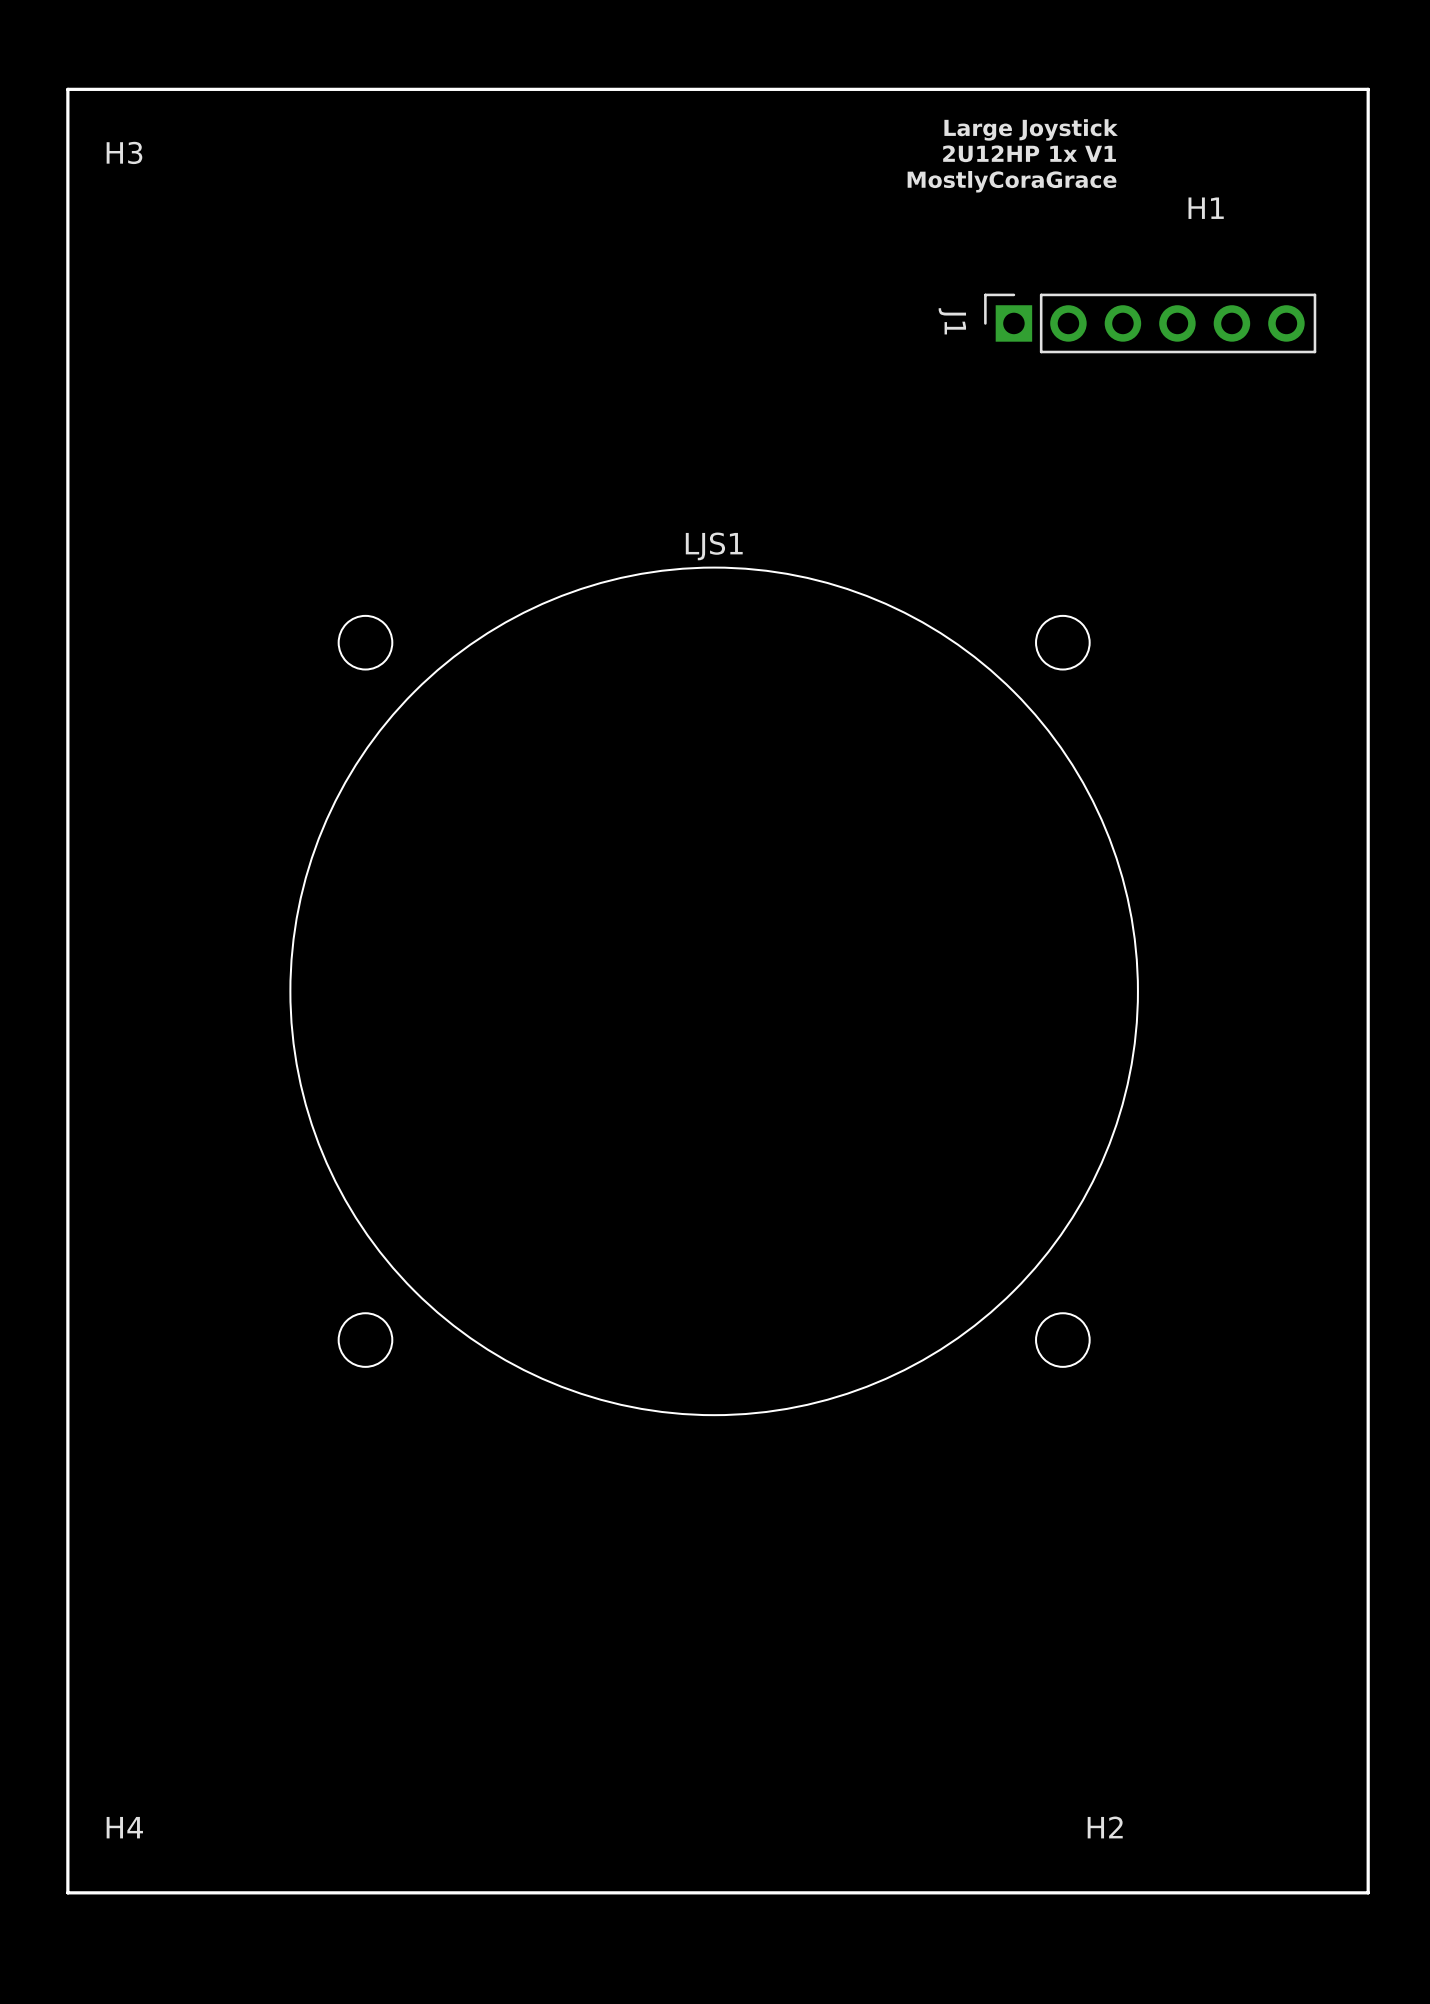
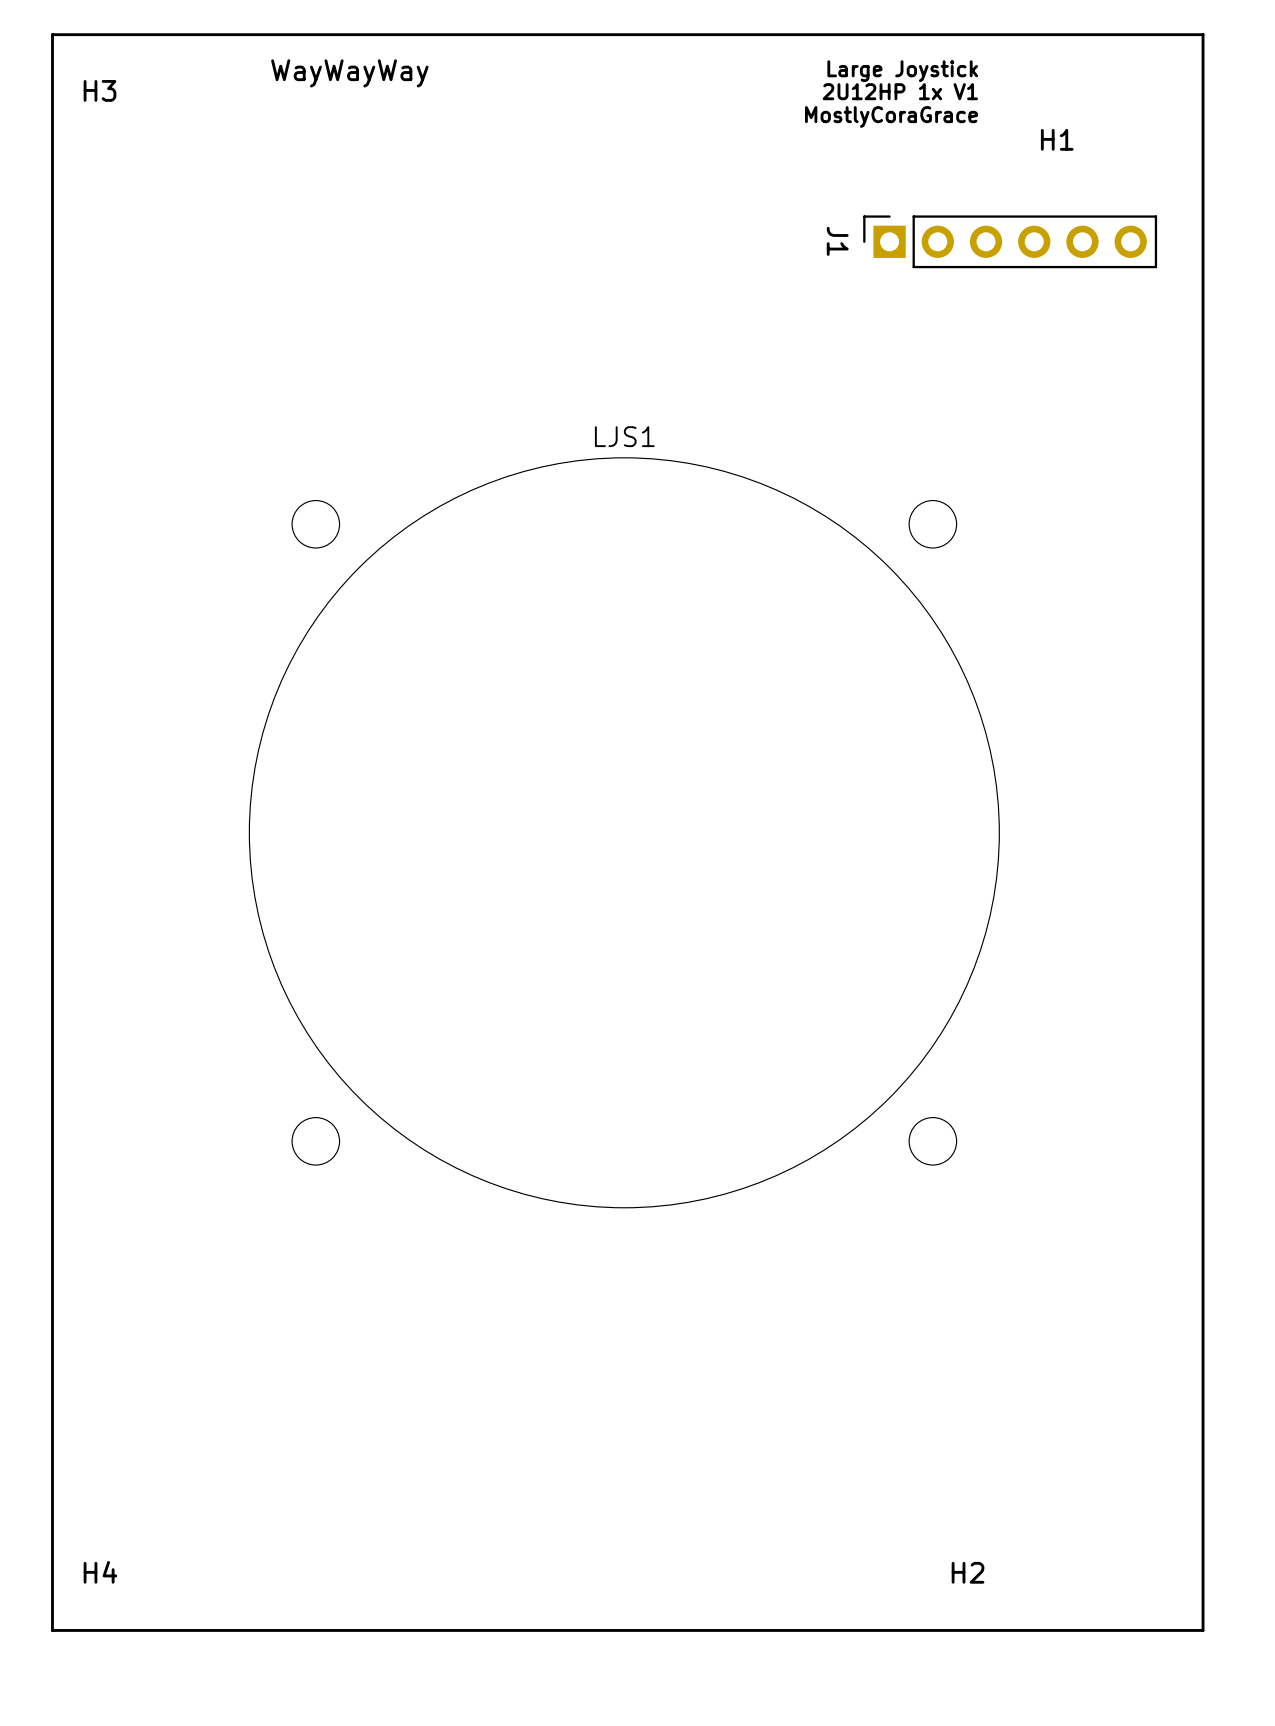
text: none -> WayWayWay (349, 73)

